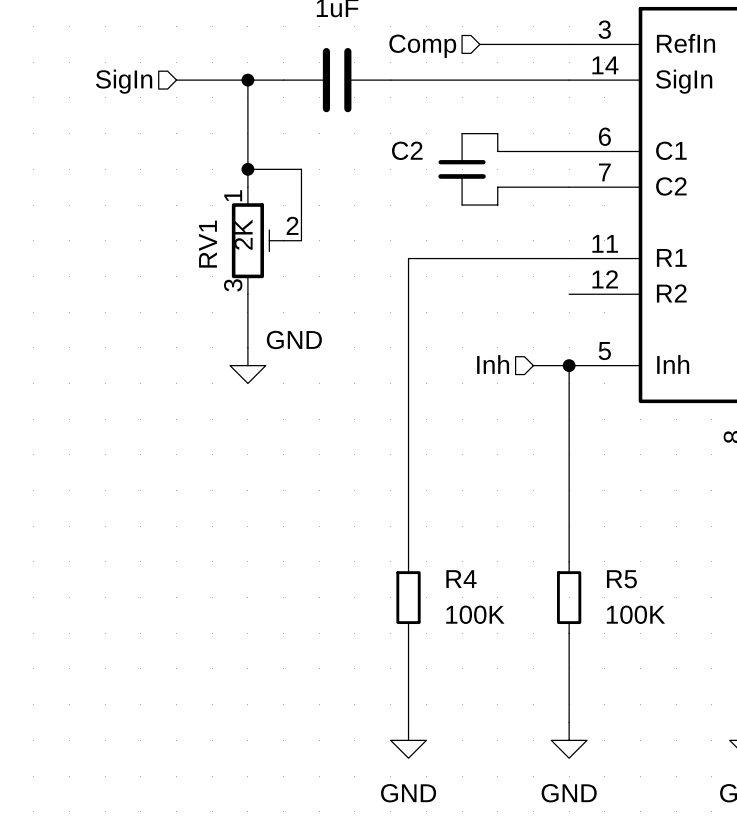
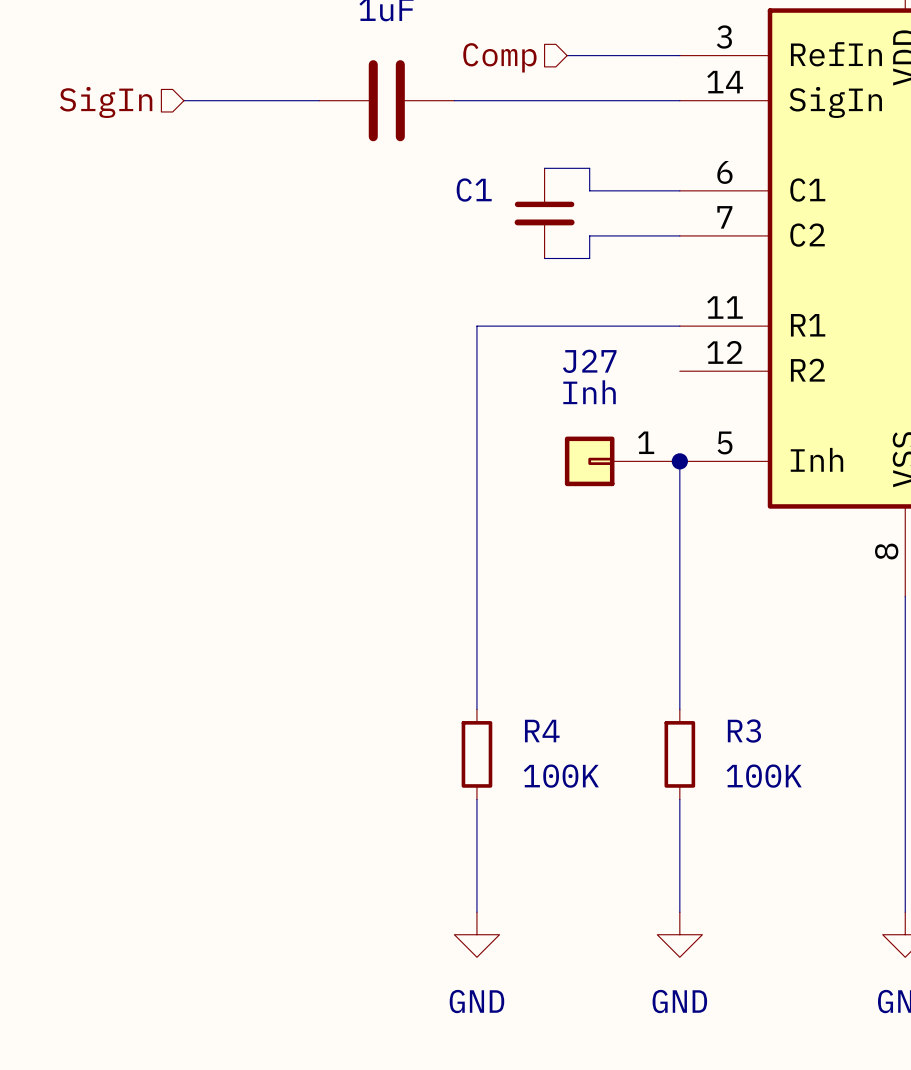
wire: (247, 80) (247, 187) -> none
junction: (247, 80) -> none
C2 name: C2 (407, 150) -> C1 (474, 190)
wire: (247, 169) (301, 169) (301, 240) -> none
junction: (247, 169) -> none
RV1: 2K (266, 240) -> none
wire: (247, 294) (247, 347) -> none
hierarchical label: Inh (493, 364) -> none
power symbol: GND (247, 365) -> none
J27: none -> Inh (622, 461)
R5 name: R5 (621, 579) -> R3 (744, 731)

